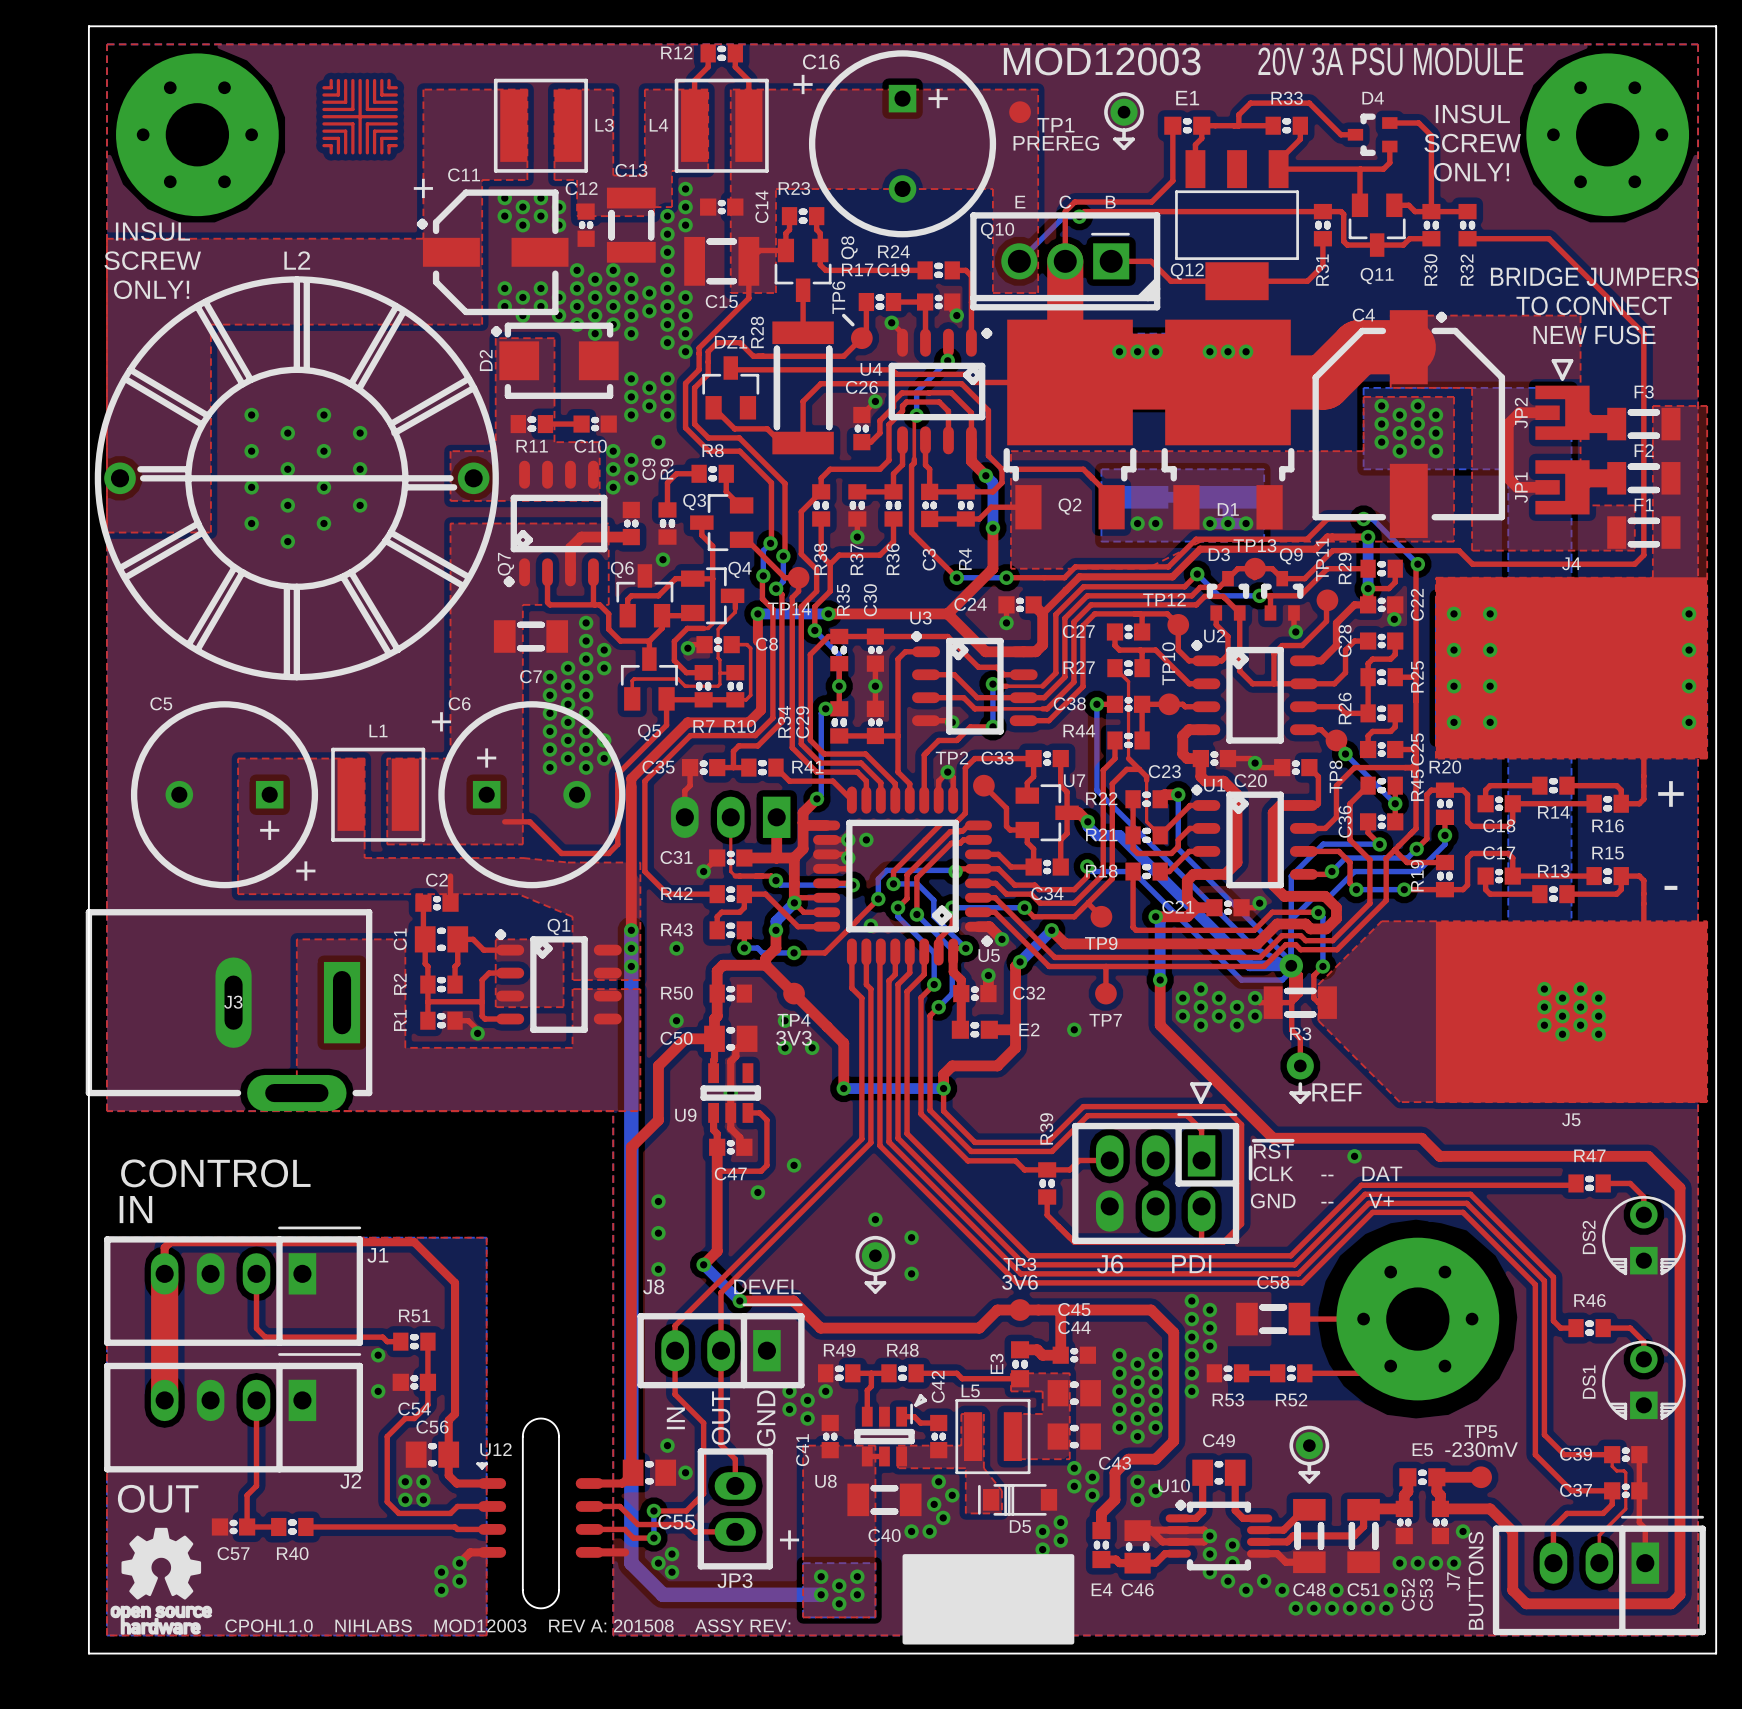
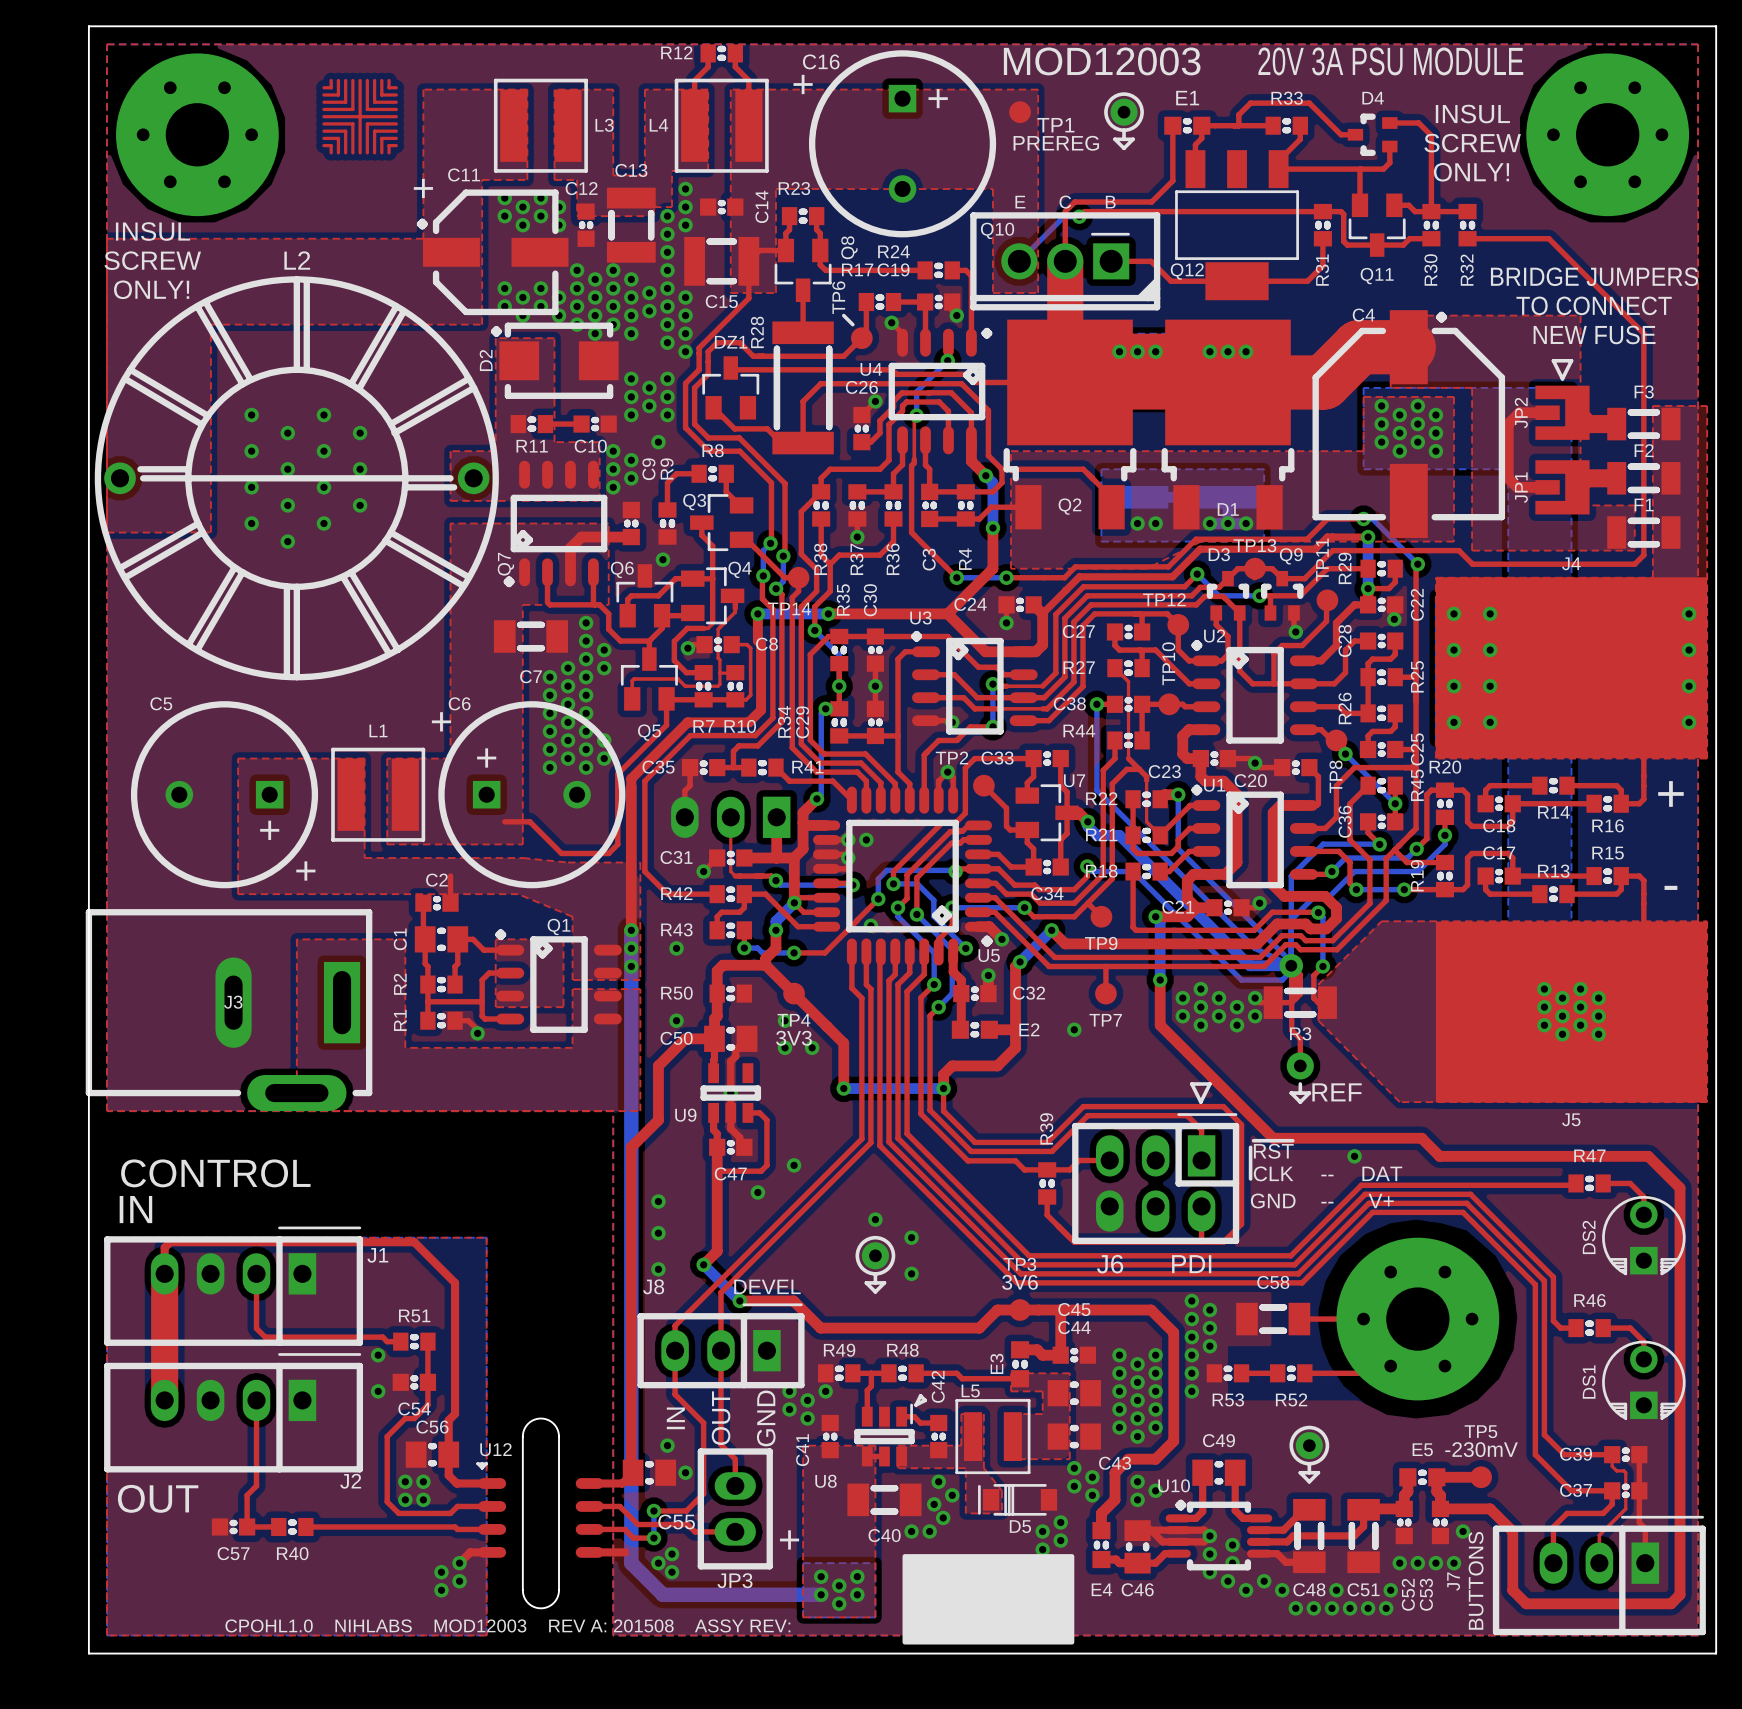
drawing: [110, 1527, 213, 1635] -> none

